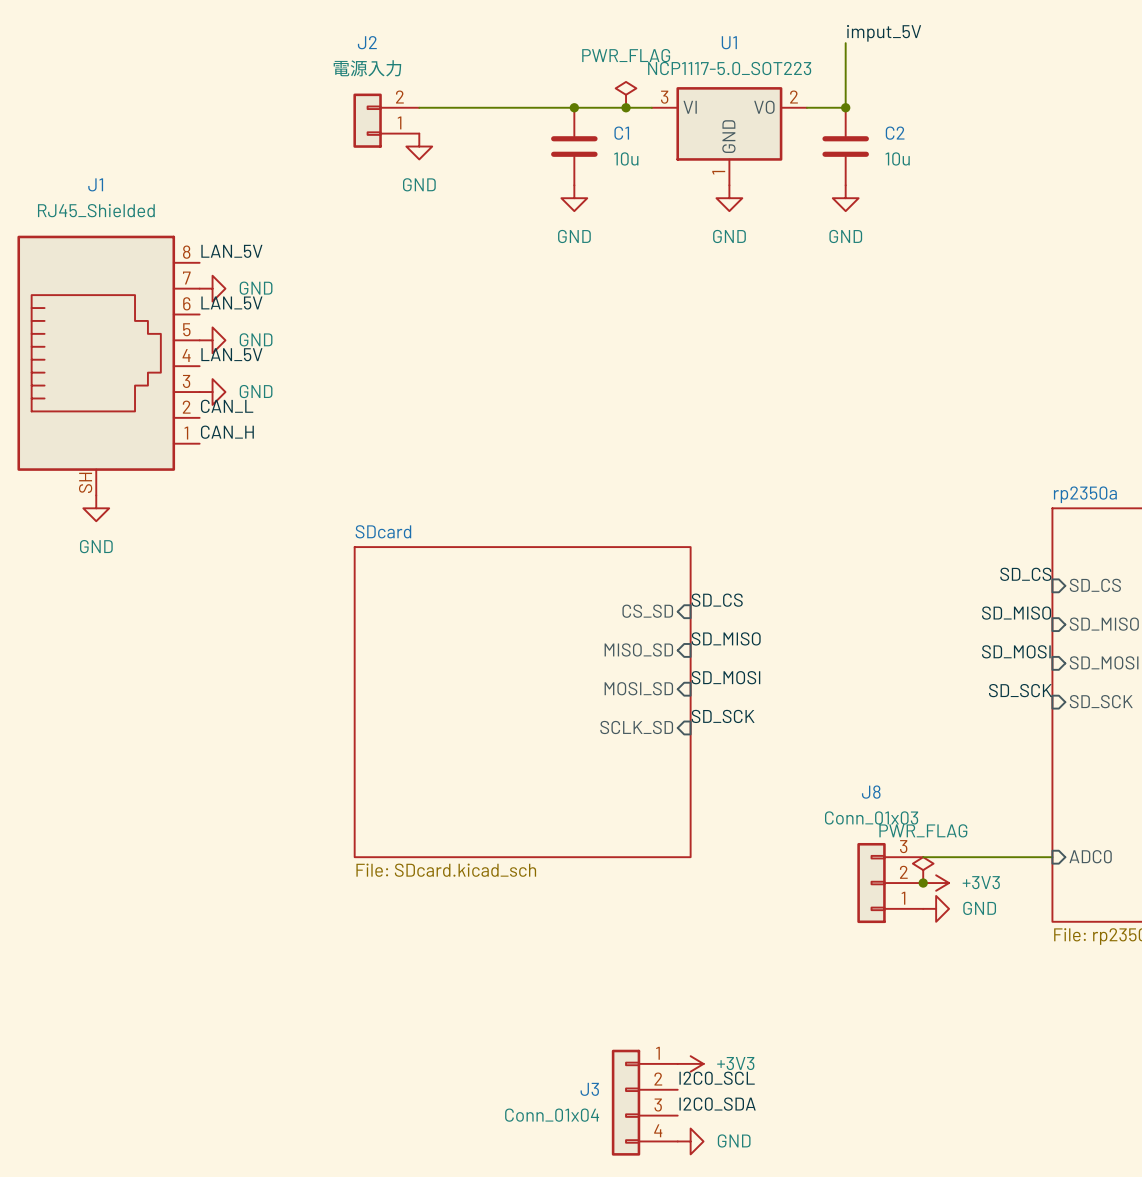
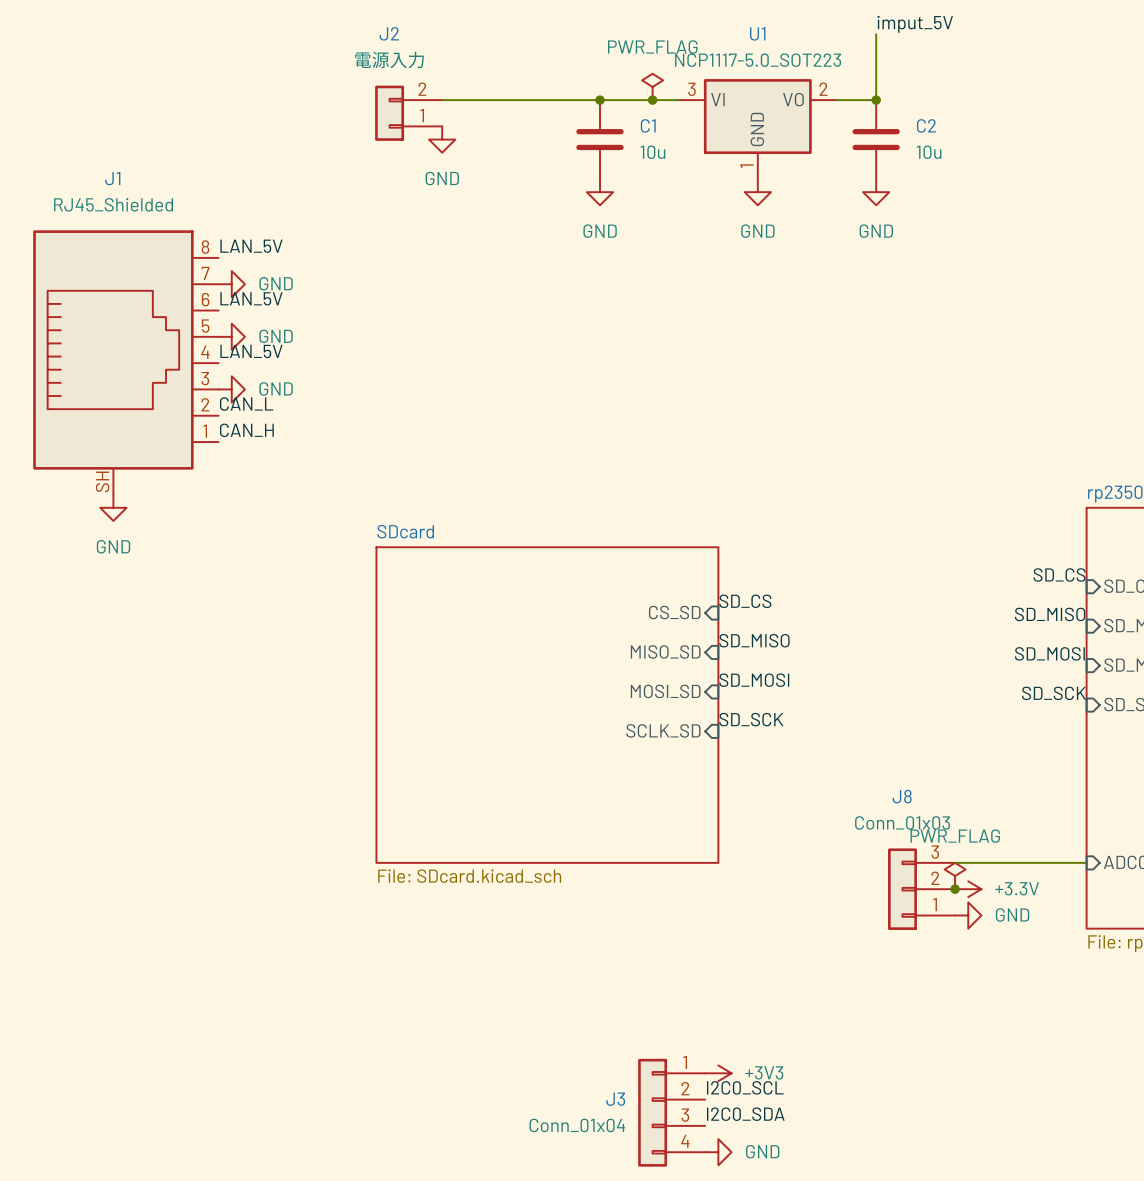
power symbol: +3V3 (936, 883) -> +3.3V (968, 889)

